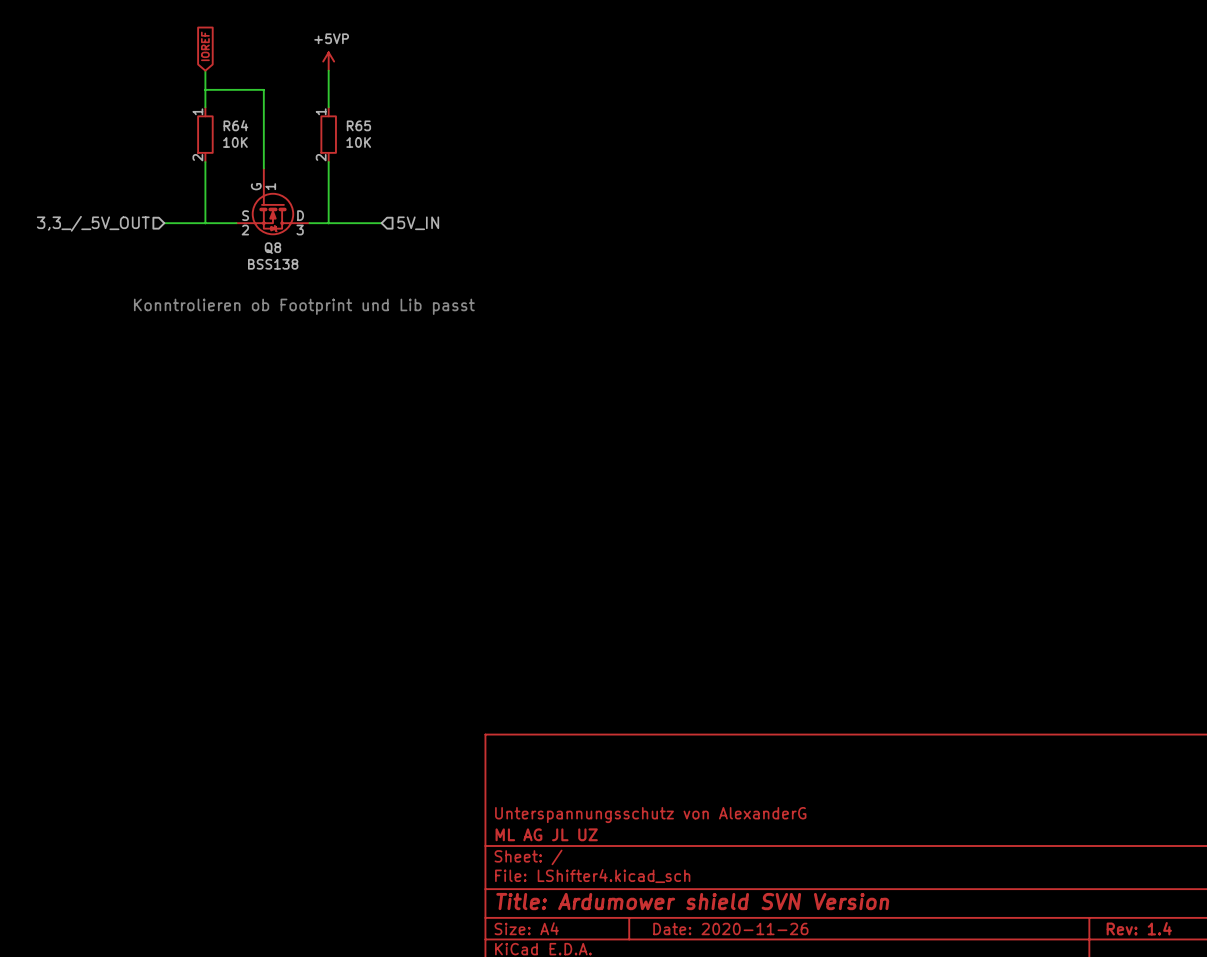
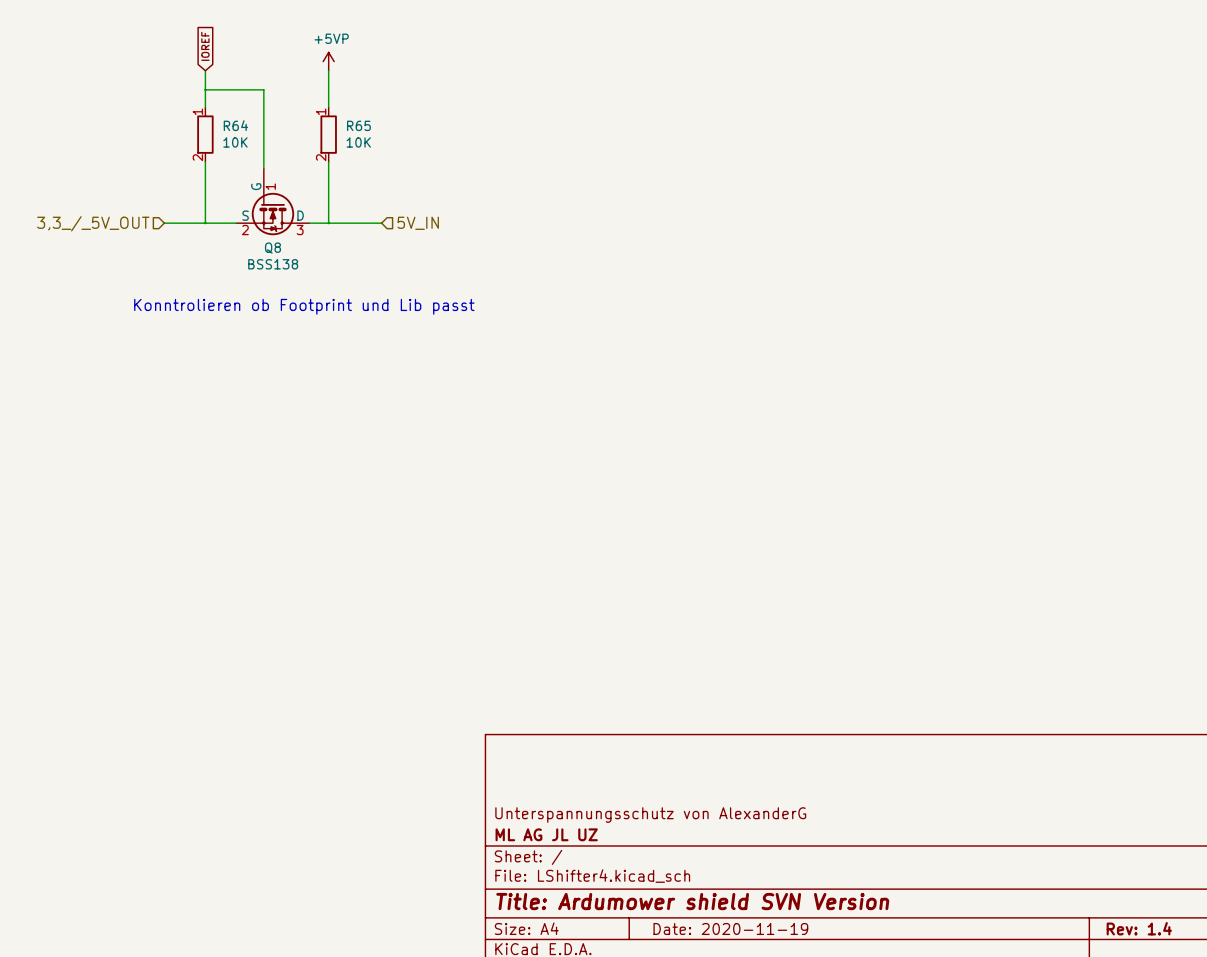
title block: Date: 2020-11-26 (730, 928) -> Date: 2020-11-19 (730, 928)

